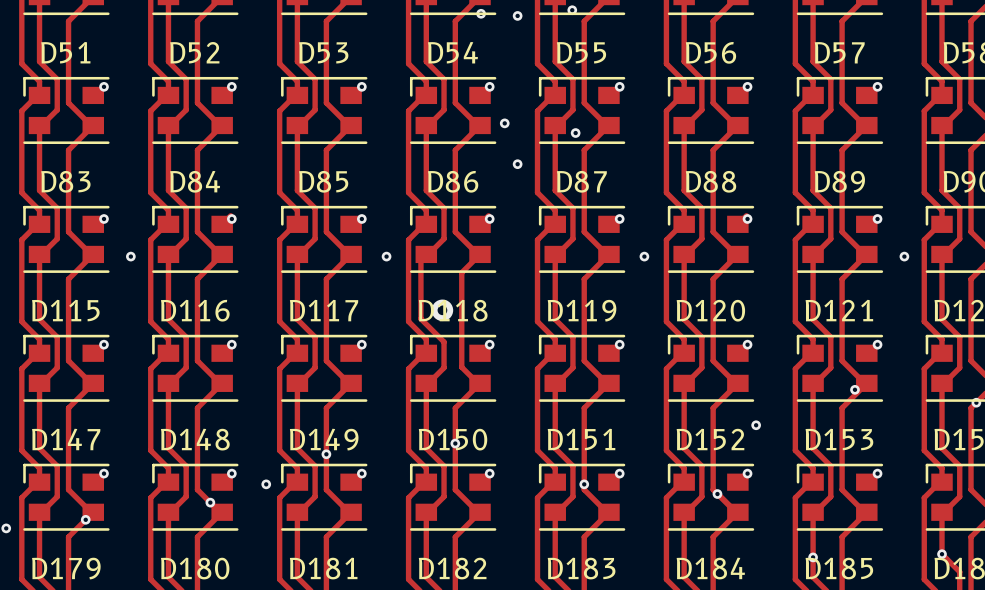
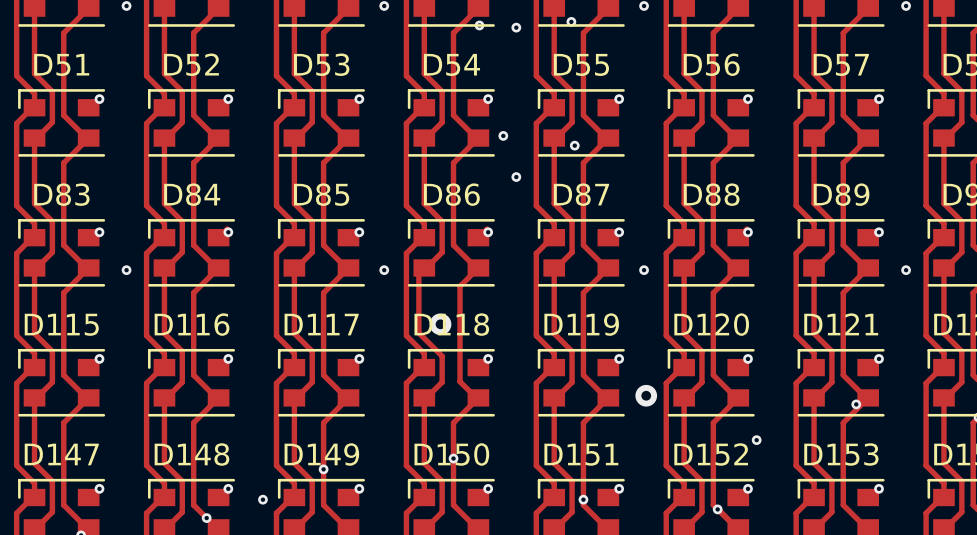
via: none -> (646, 395)

